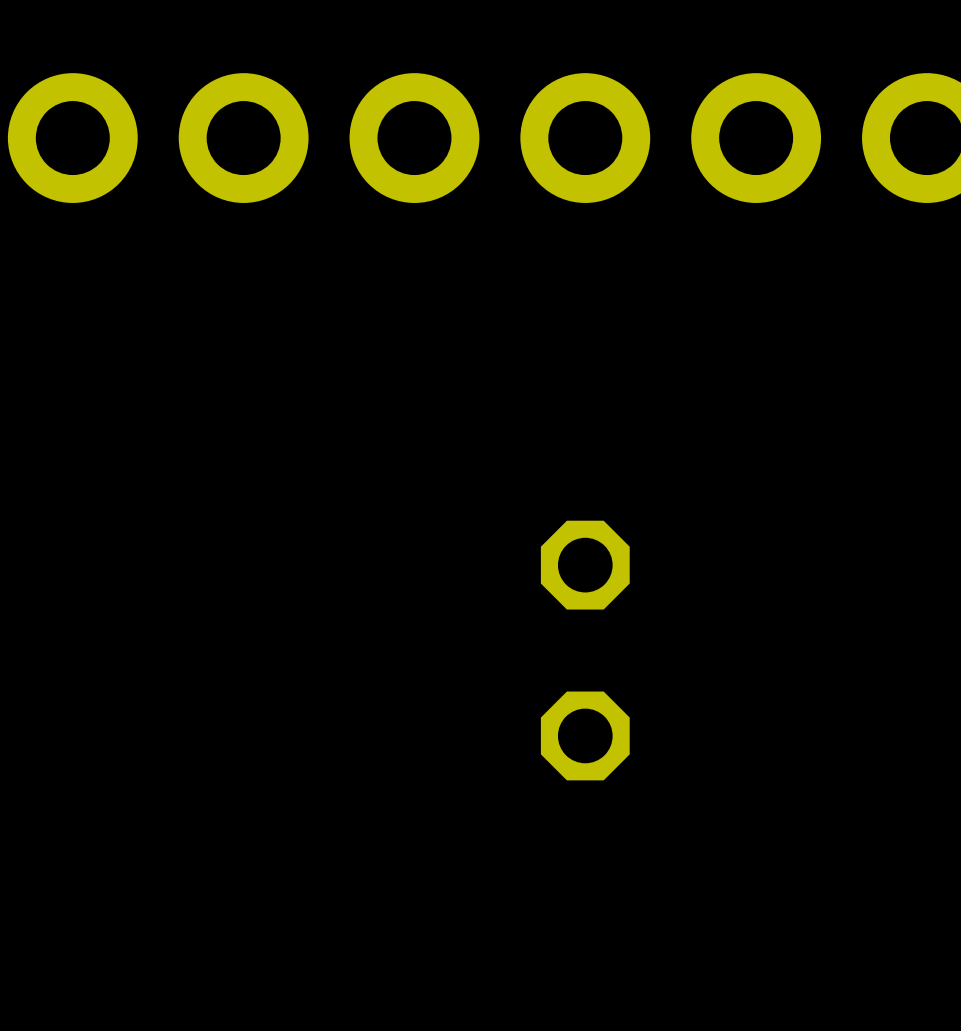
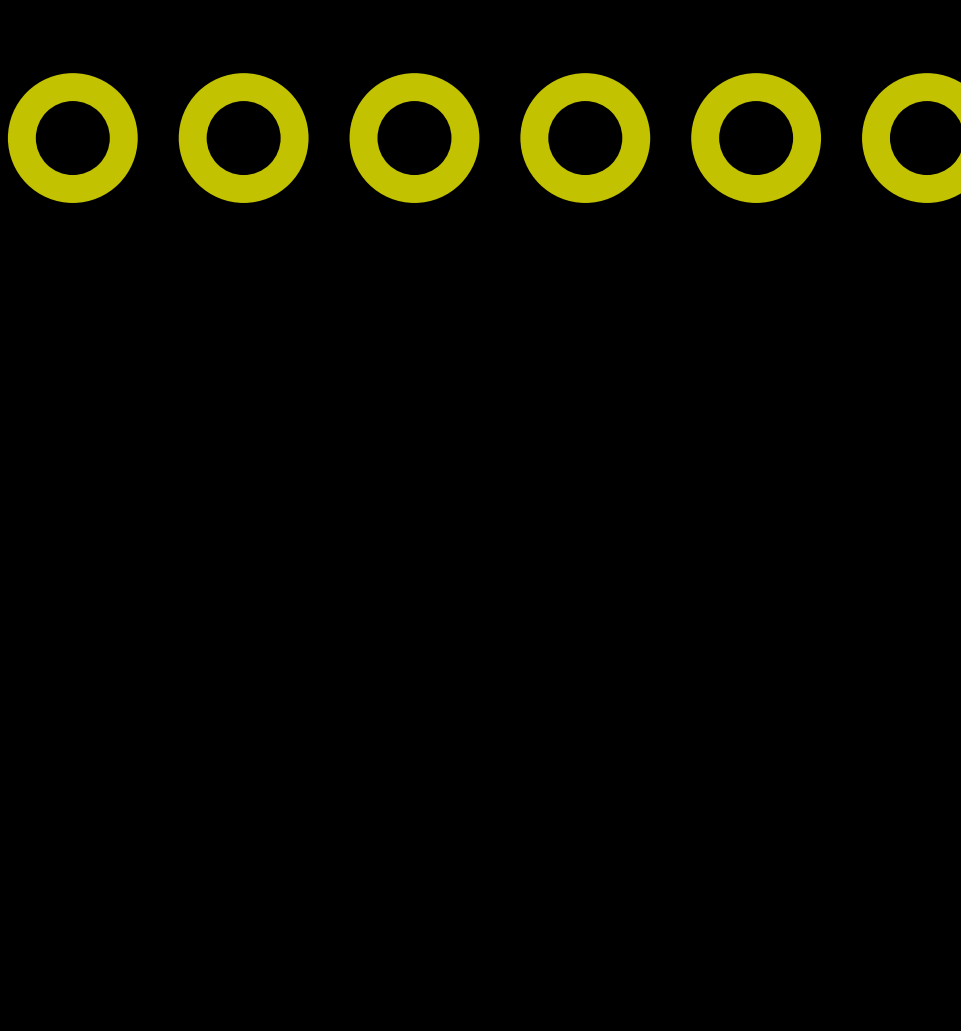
part: (585, 650) -> none

